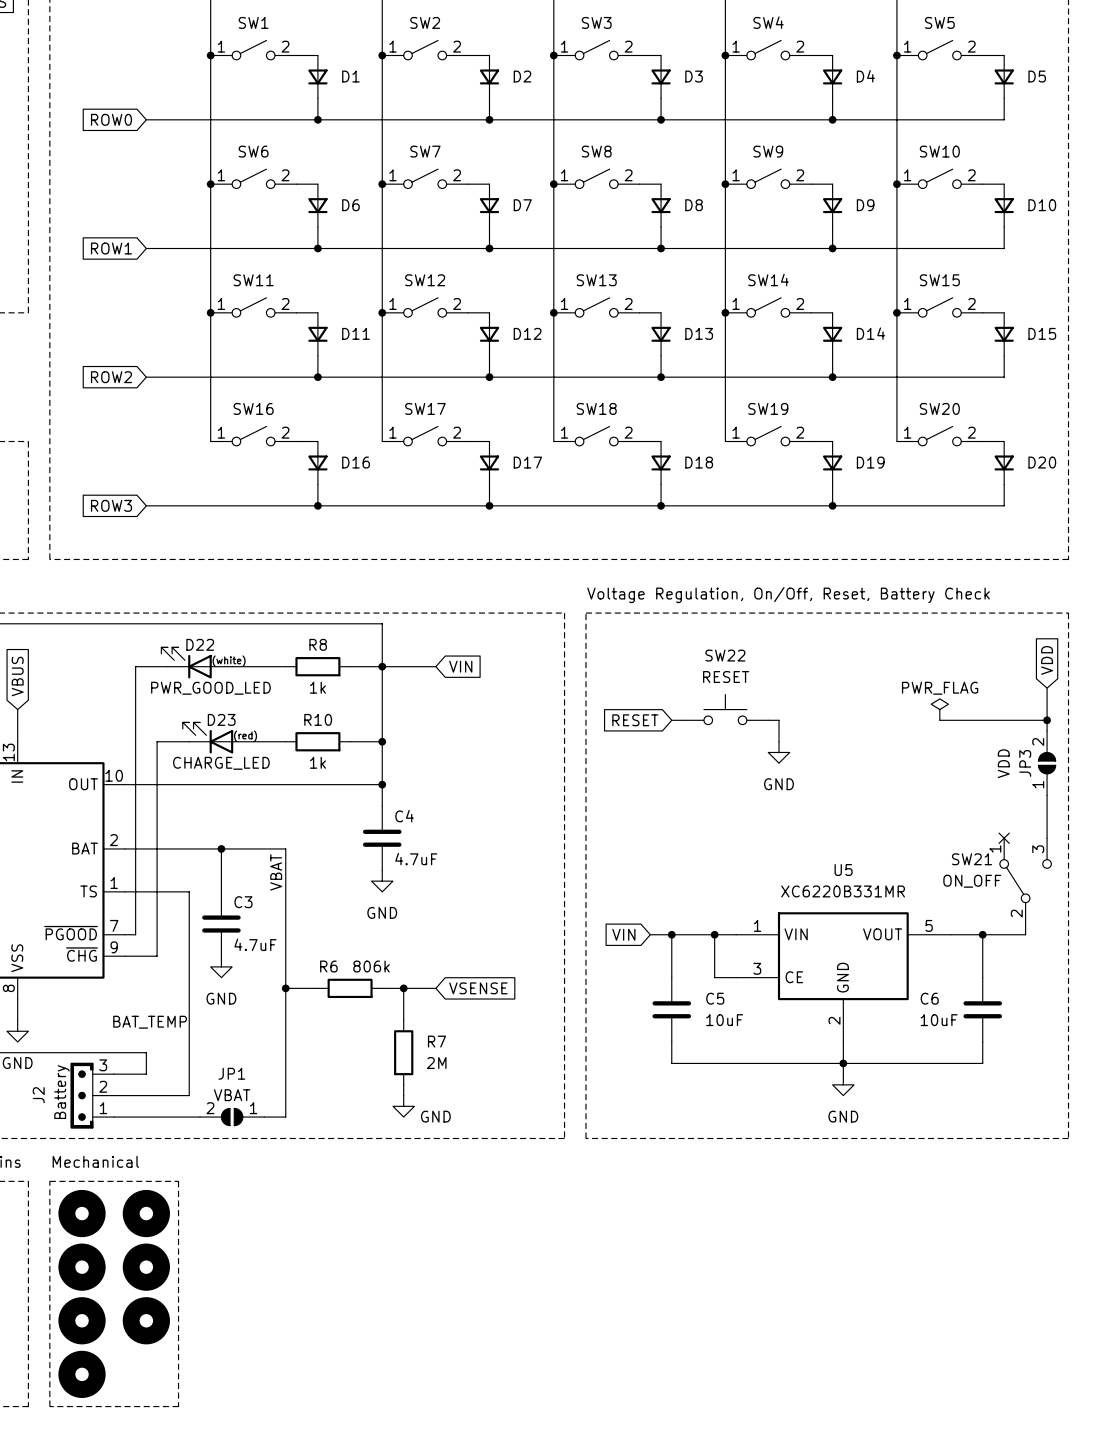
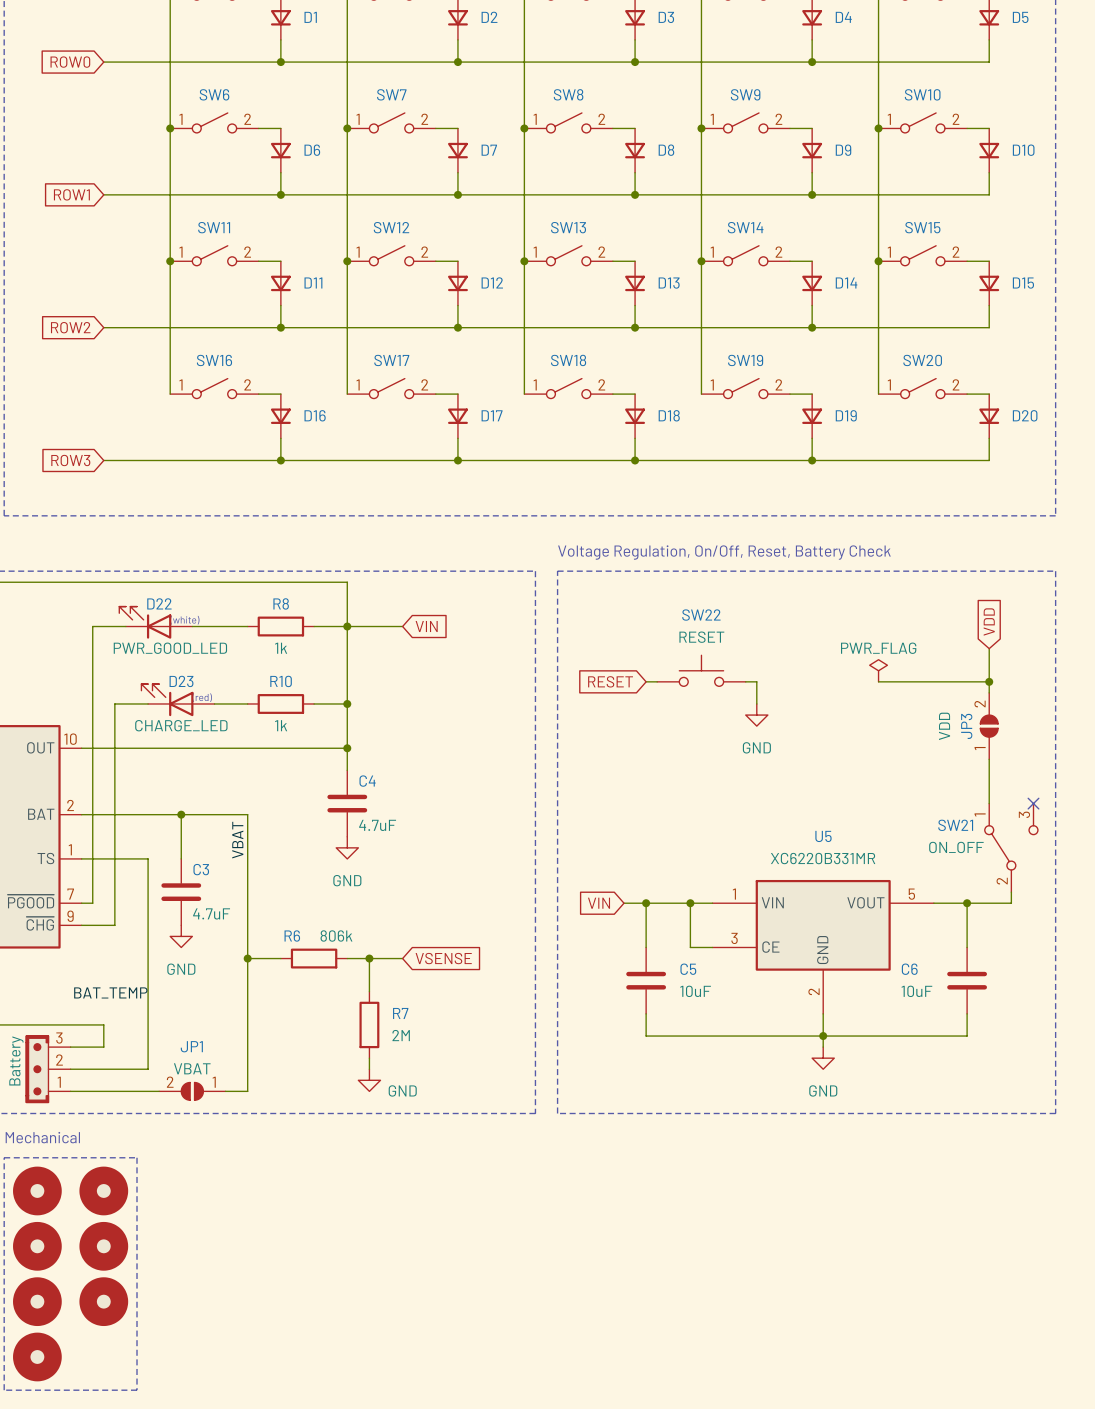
global label position: VDD (1047, 660) -> VDD (989, 621)
wire: (1047, 688) (1047, 731) -> (989, 648) (989, 692)
power symbol position: PWR_FLAG (939, 709) -> PWR_FLAG (878, 670)
wire: (1004, 720) (1047, 720) -> (878, 681) (922, 681)
junction position: (1047, 720) -> (989, 681)
JP3 position: (1047, 763) -> (989, 726)
wire: (1047, 795) (1047, 838) -> (989, 759) (989, 803)
no-connect mark position: (1004, 838) -> (1033, 803)

